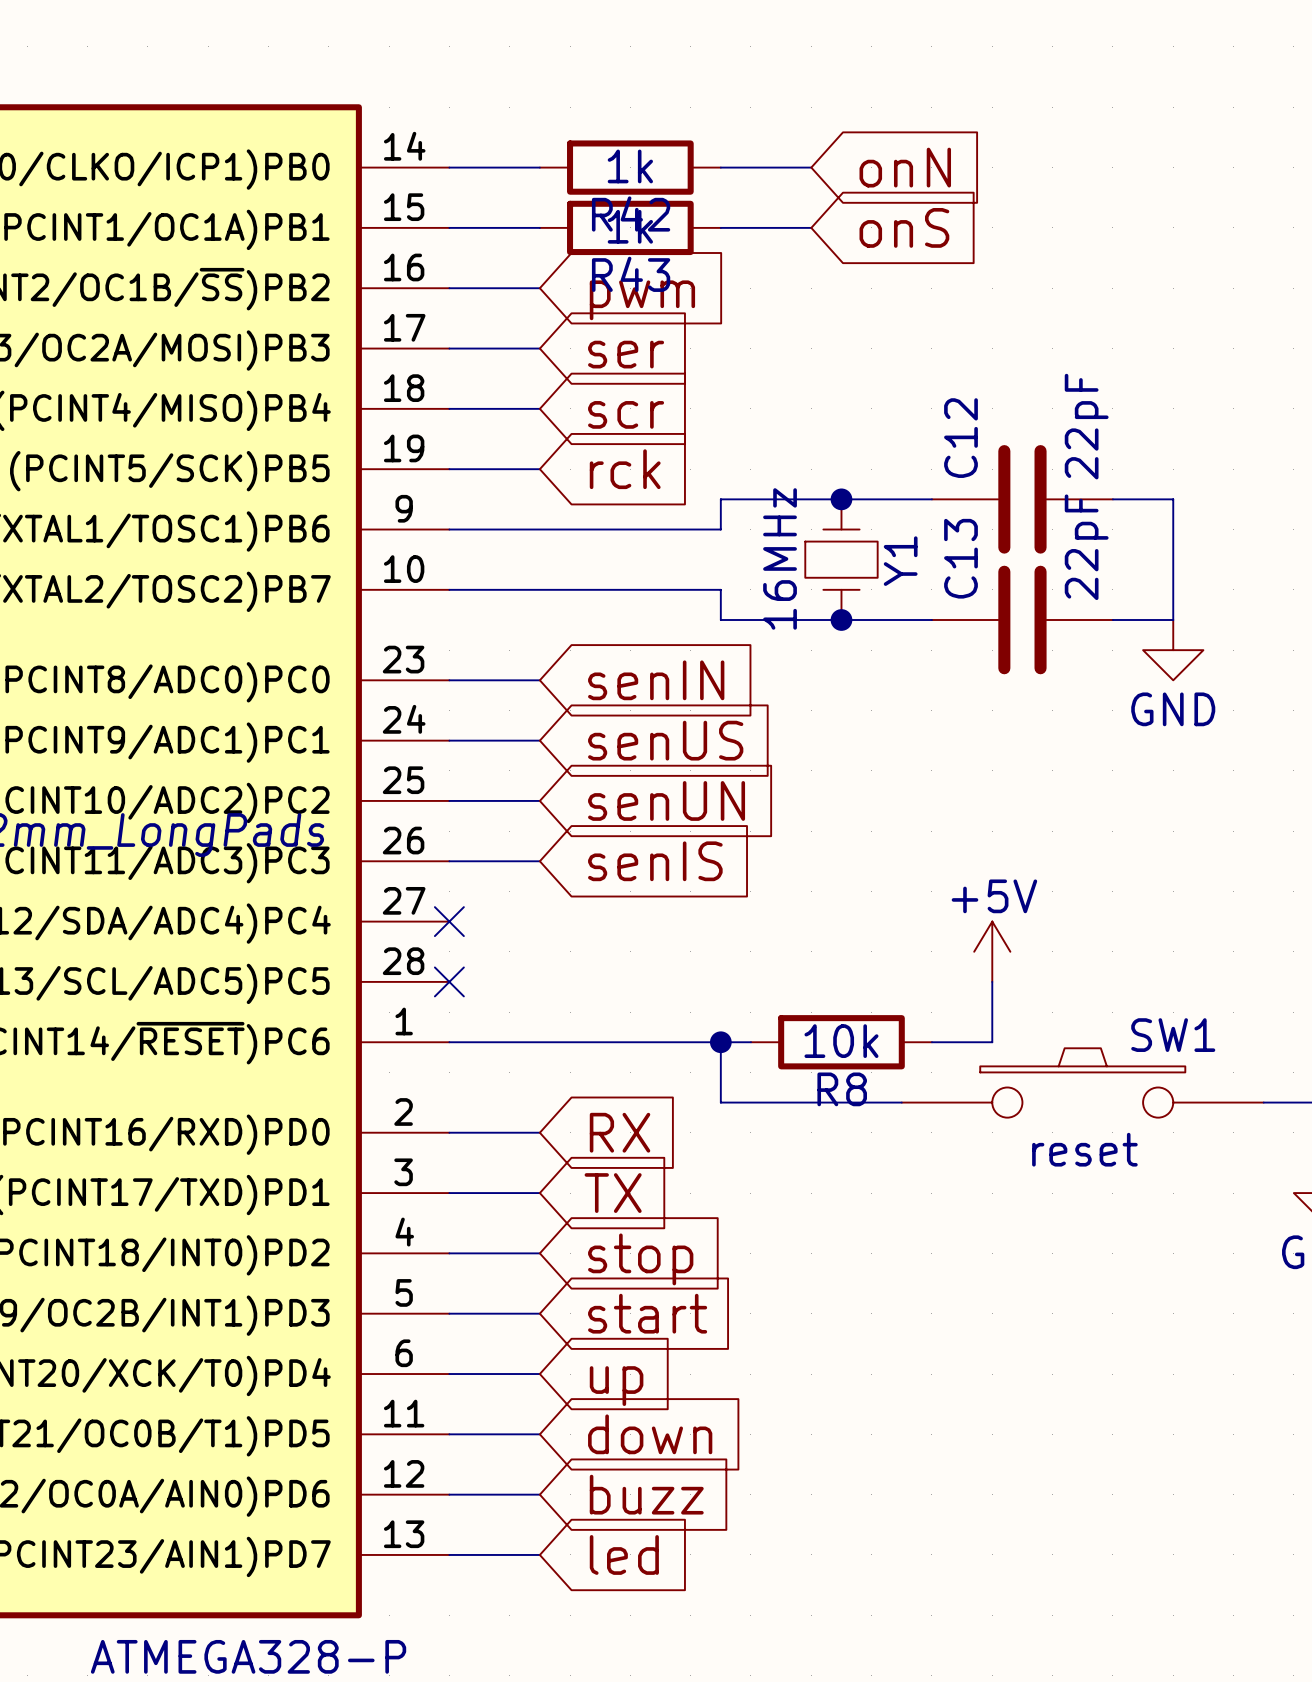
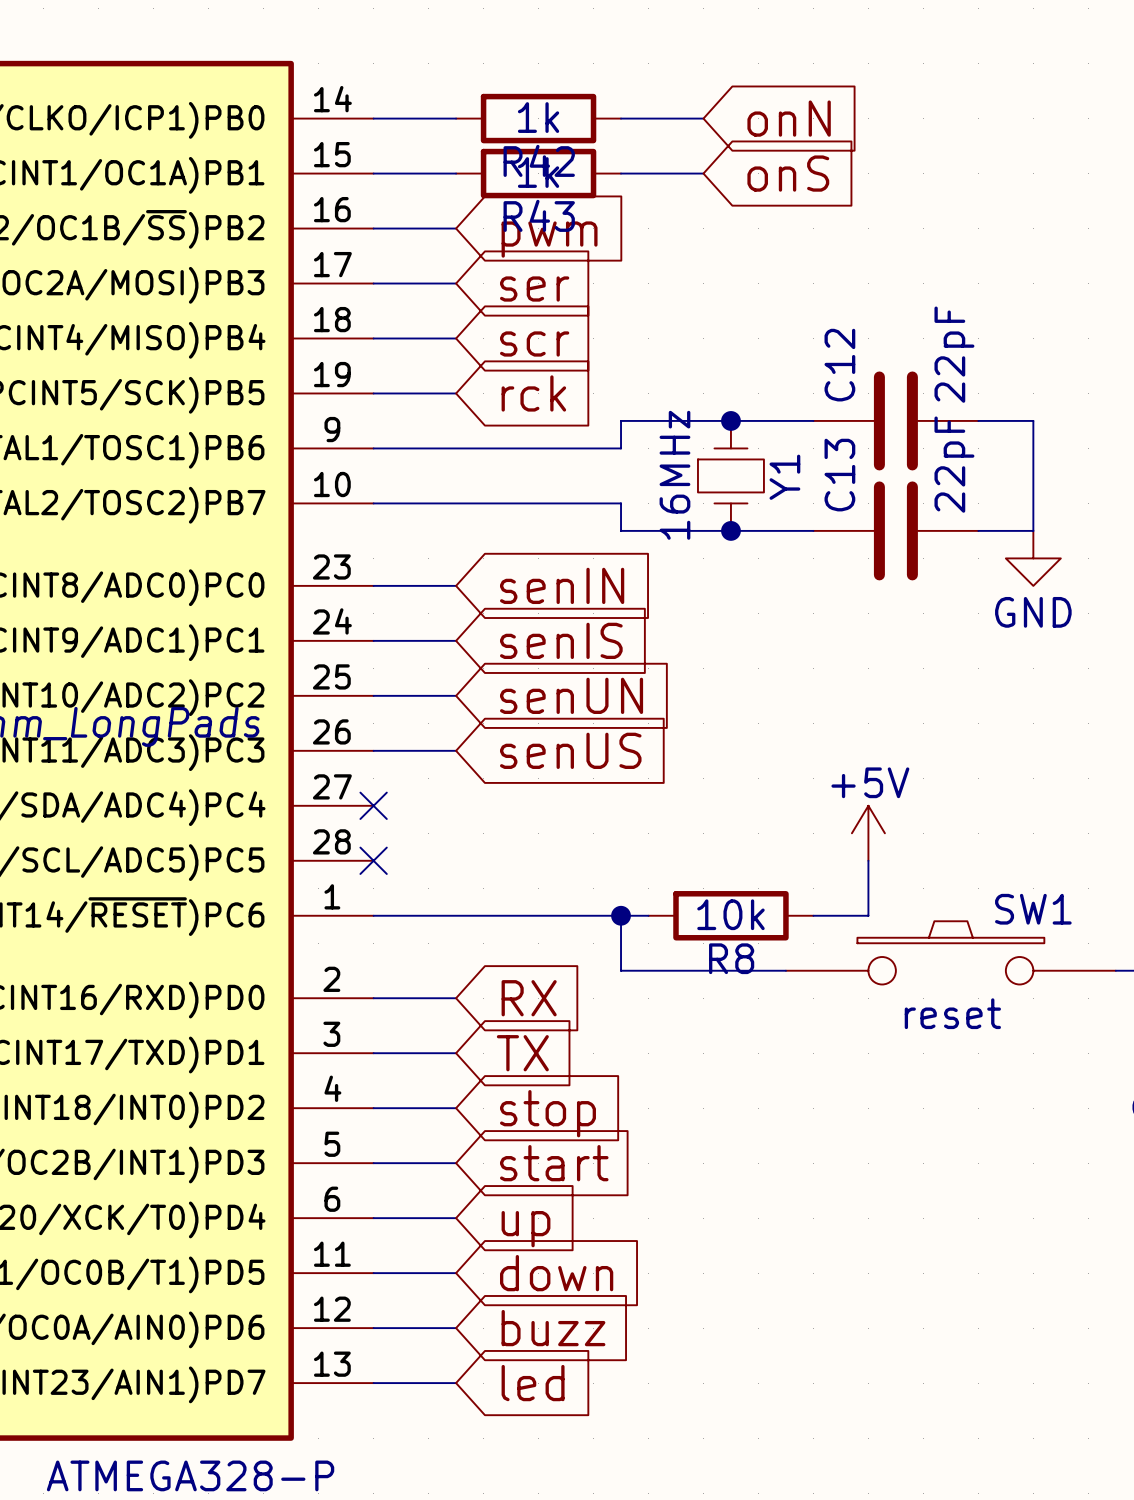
global label: senUS (665, 740) -> senIS (561, 640)
global label: senIS (655, 861) -> senUS (570, 750)

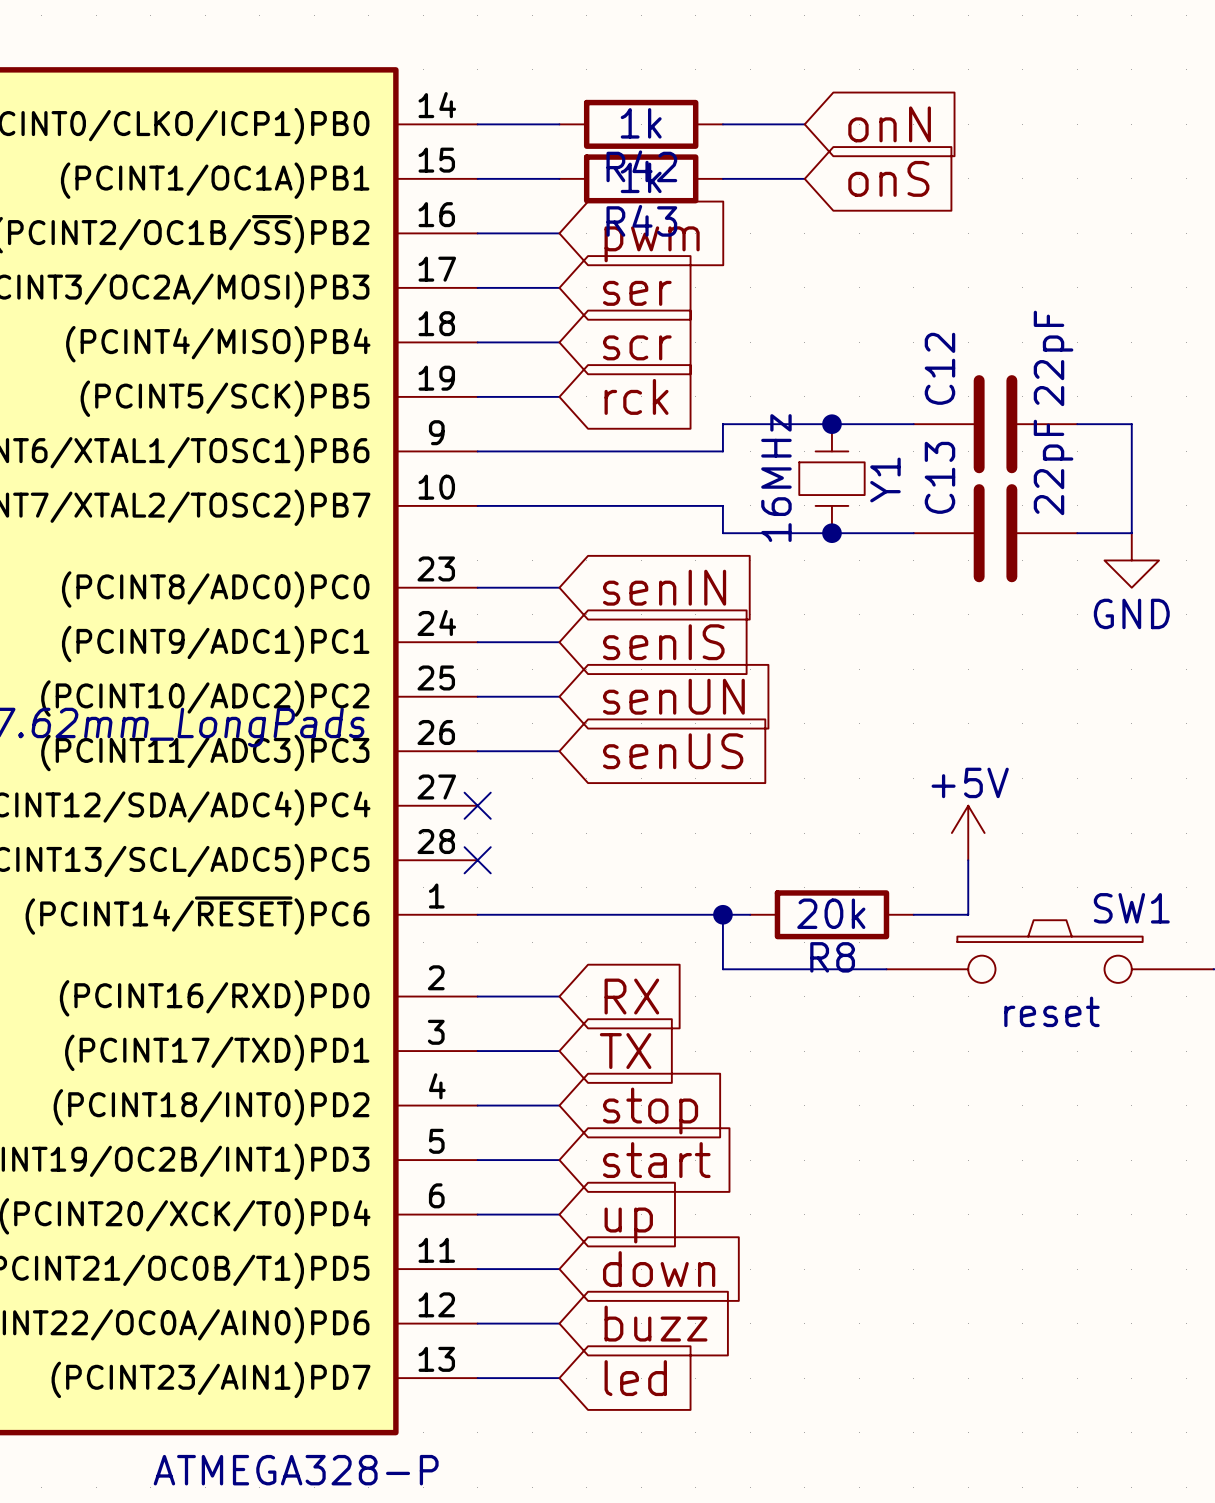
R8 value: 10k (730, 914) -> 20k (831, 913)

